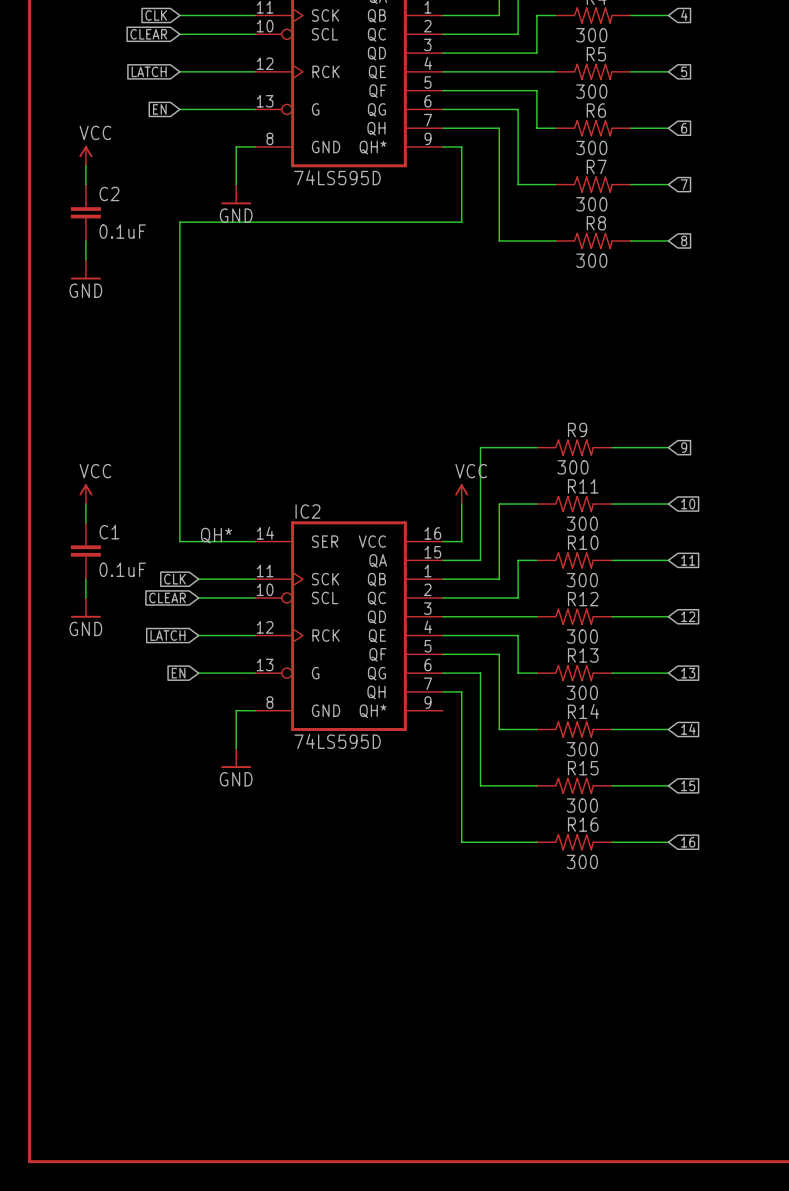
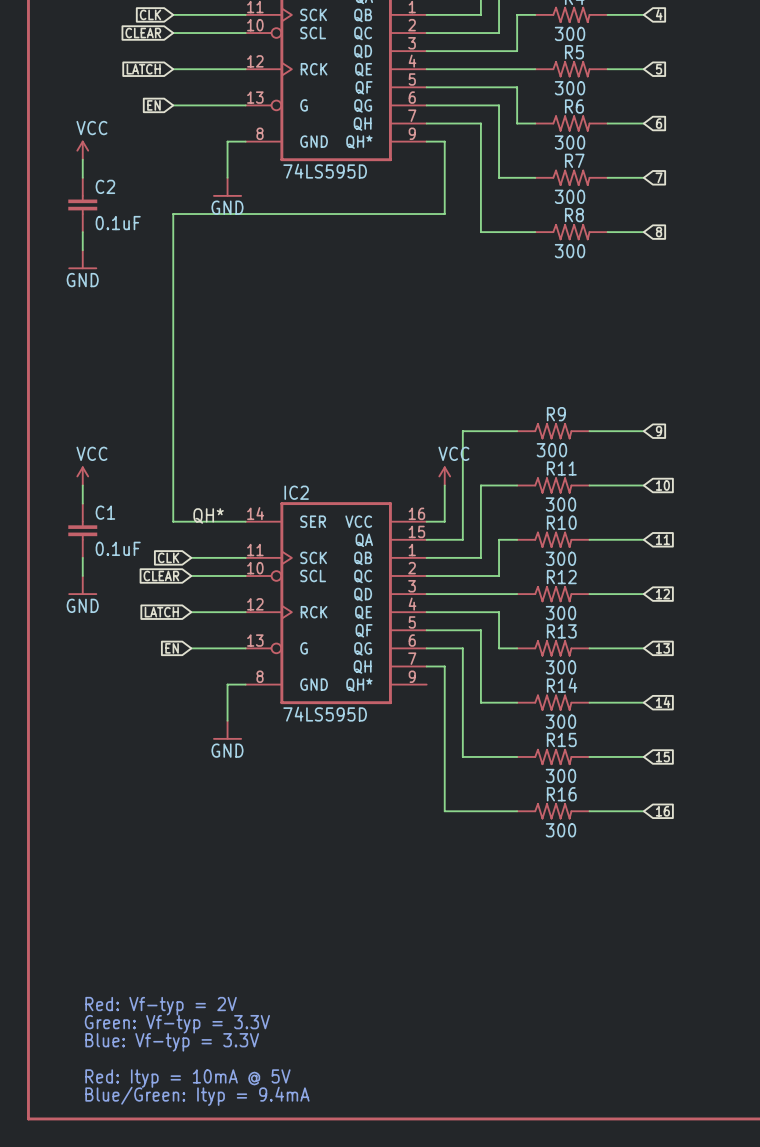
text: none -> Red: Vf-typ = 2V (161, 1006)
text: none -> Green: Vf-typ = 3.3V (177, 1024)
text: none -> Blue: Vf-typ = 3.3V (172, 1042)
text: none -> Red: Ityp = 10mA @ 5V (187, 1078)
text: none -> Blue/Green: Ityp = 9.4mA (197, 1096)

